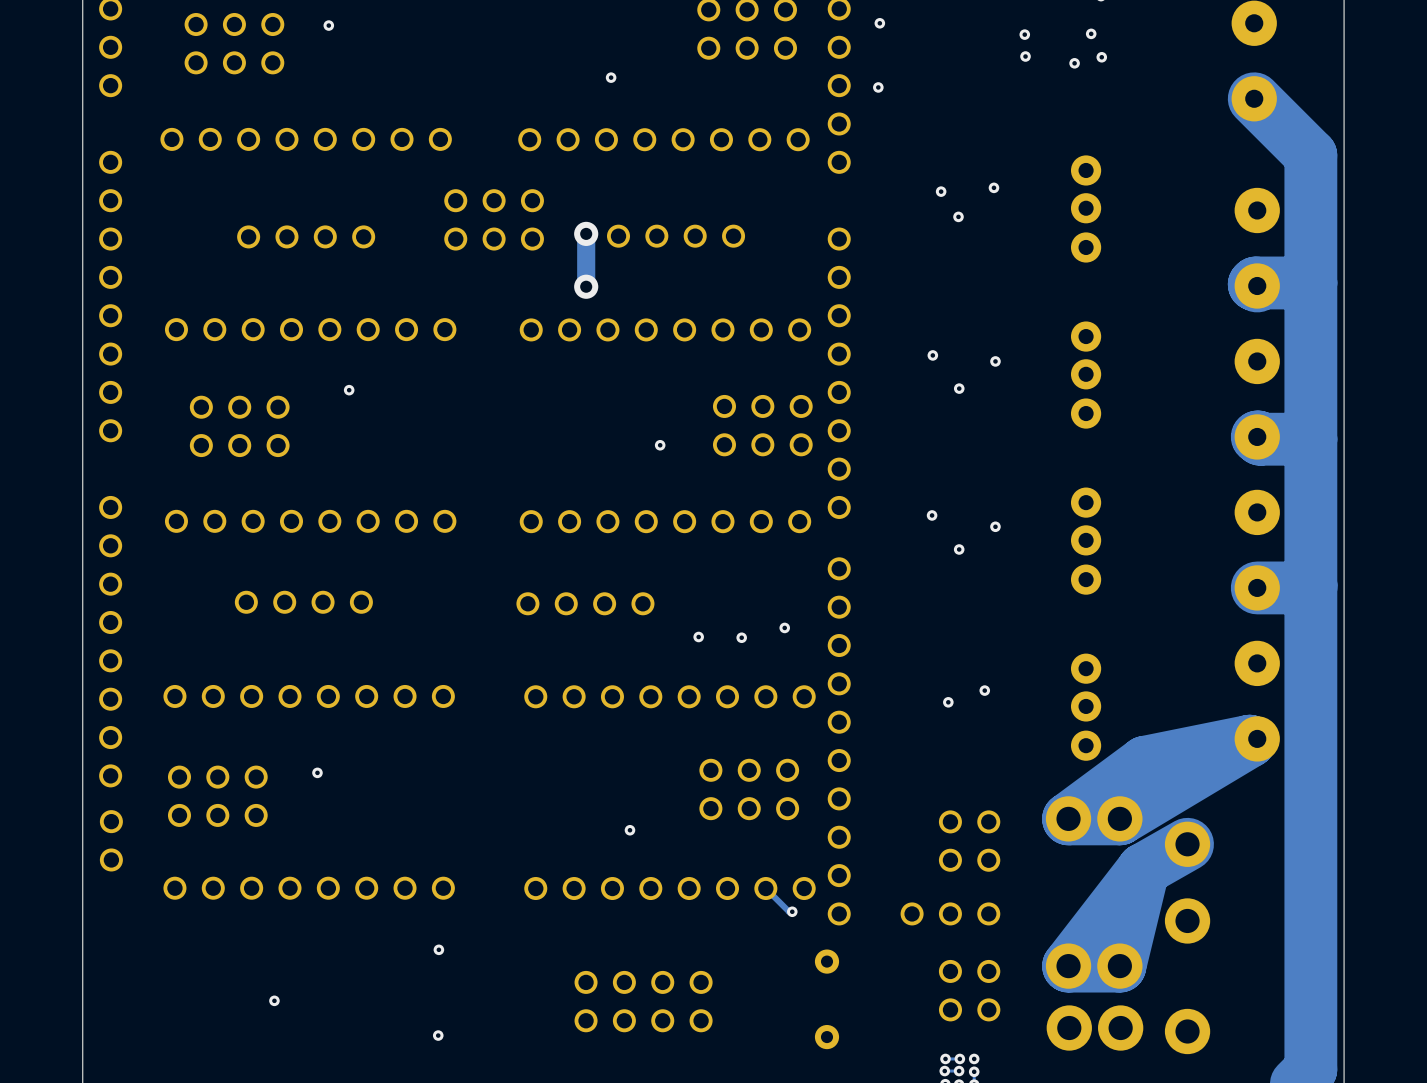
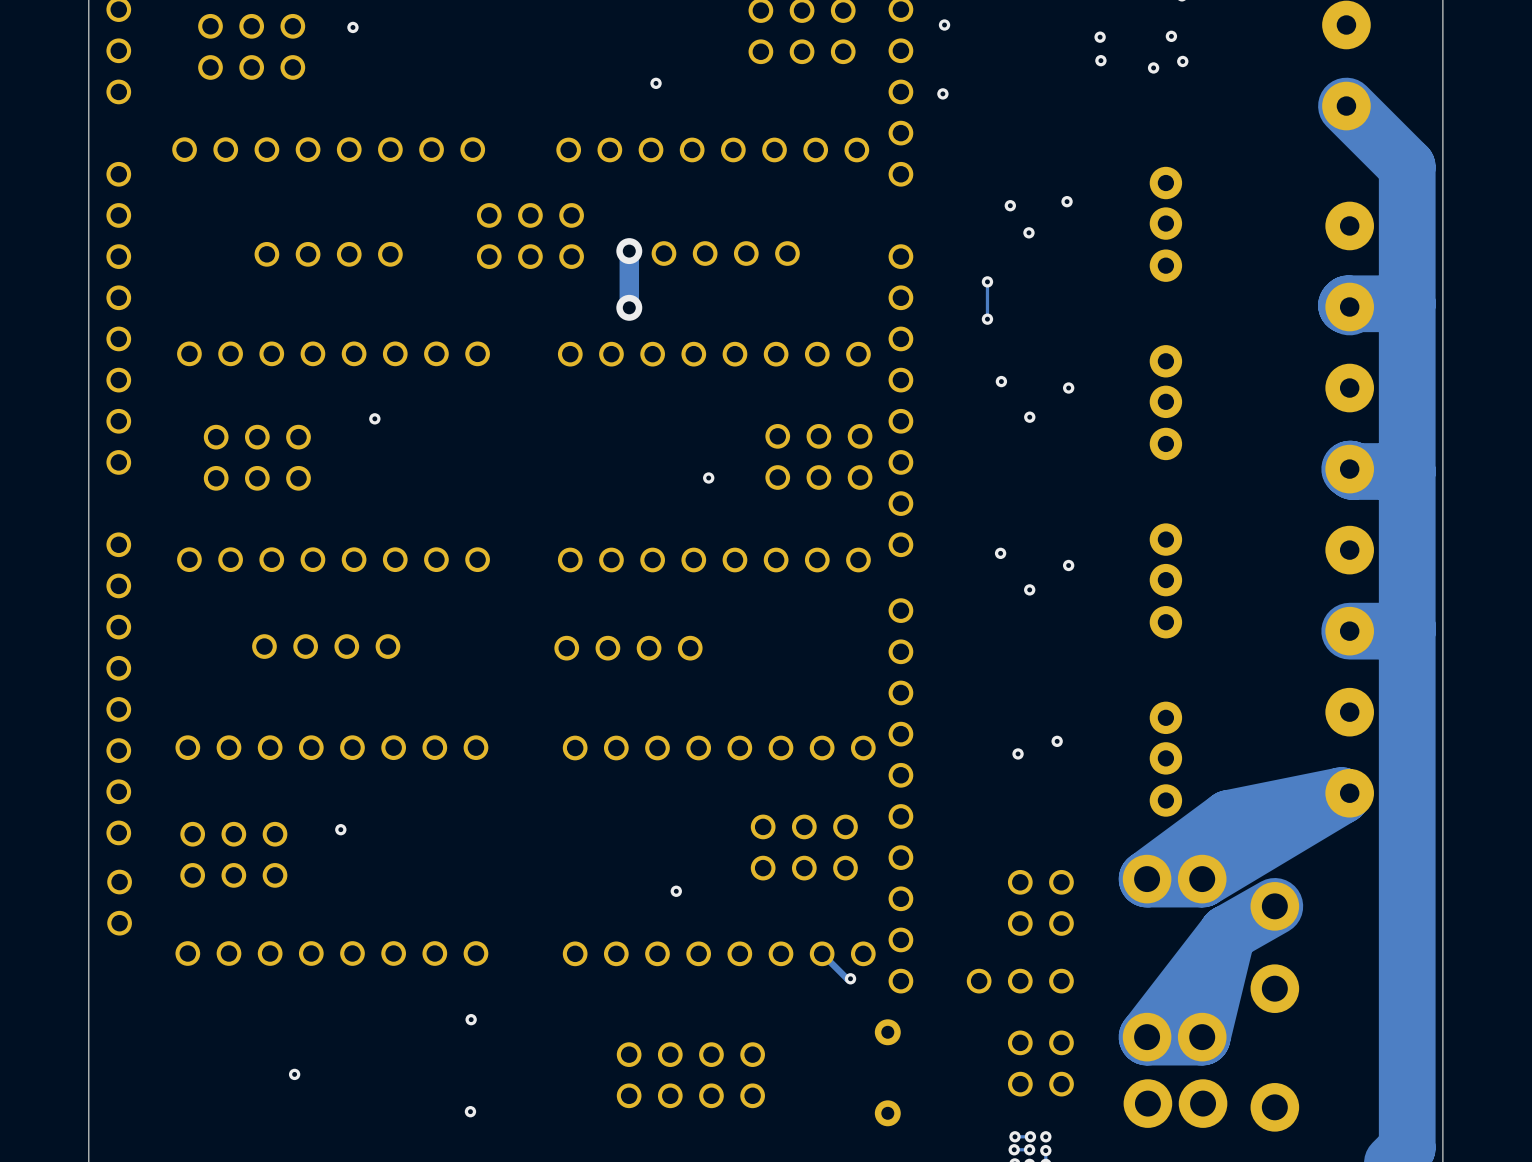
track: none -> (987, 281) (987, 319)
via: none -> (987, 281)
via: none -> (987, 319)
via: (784, 627) -> none
via: (698, 636) -> none
via: (741, 637) -> none

